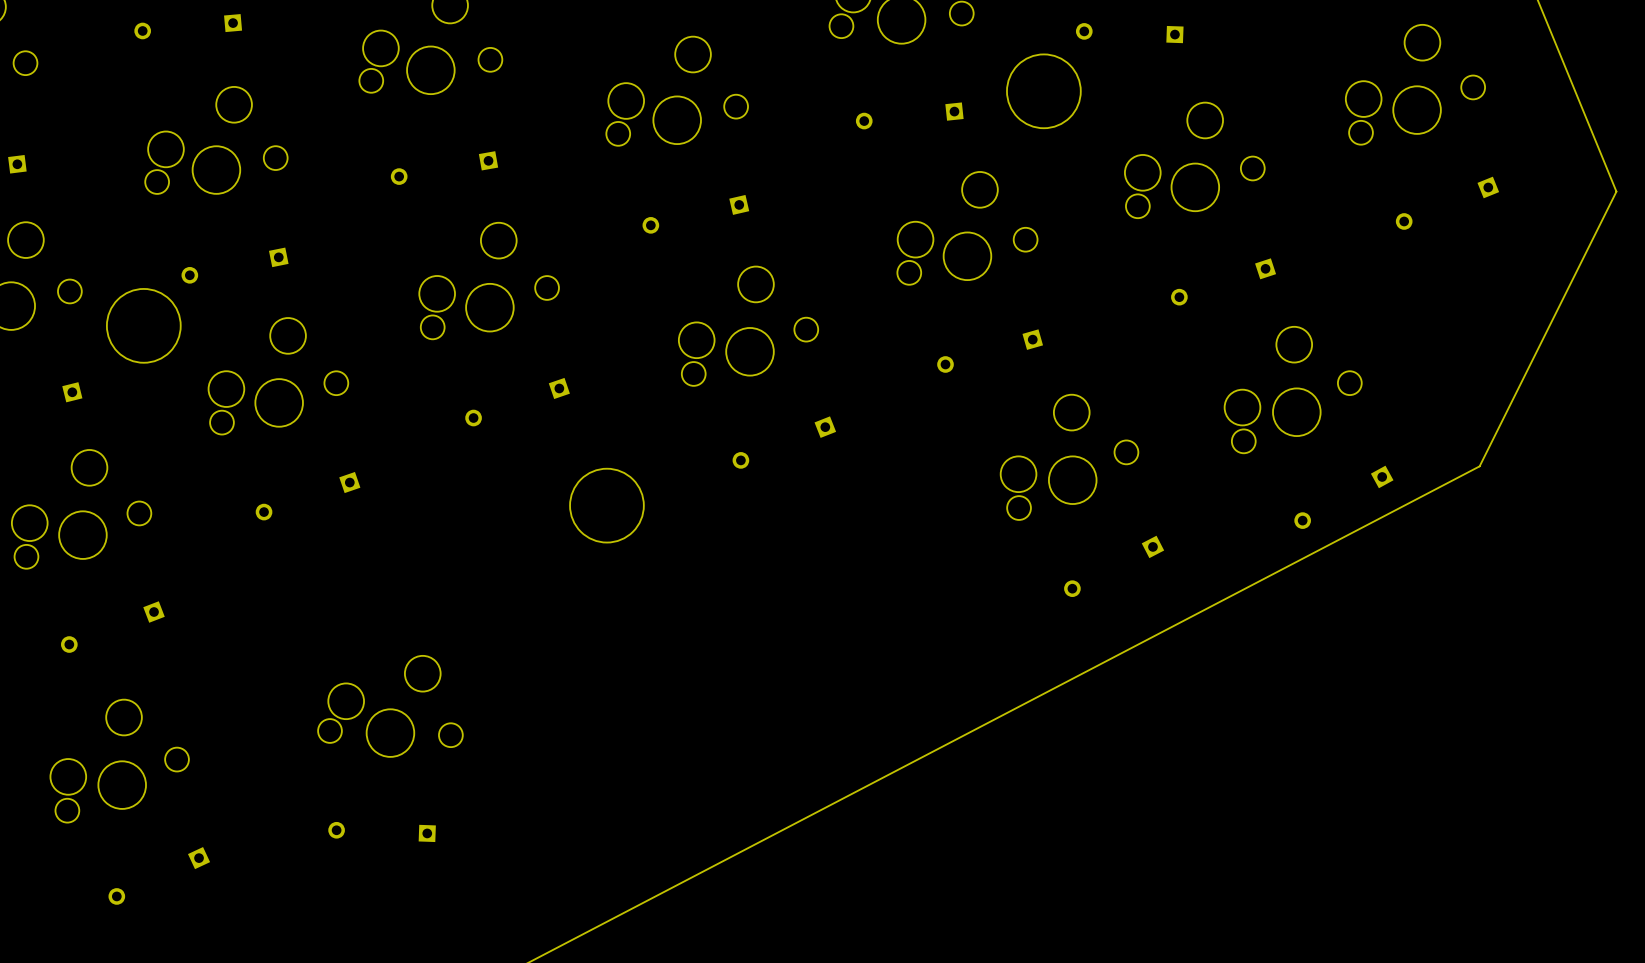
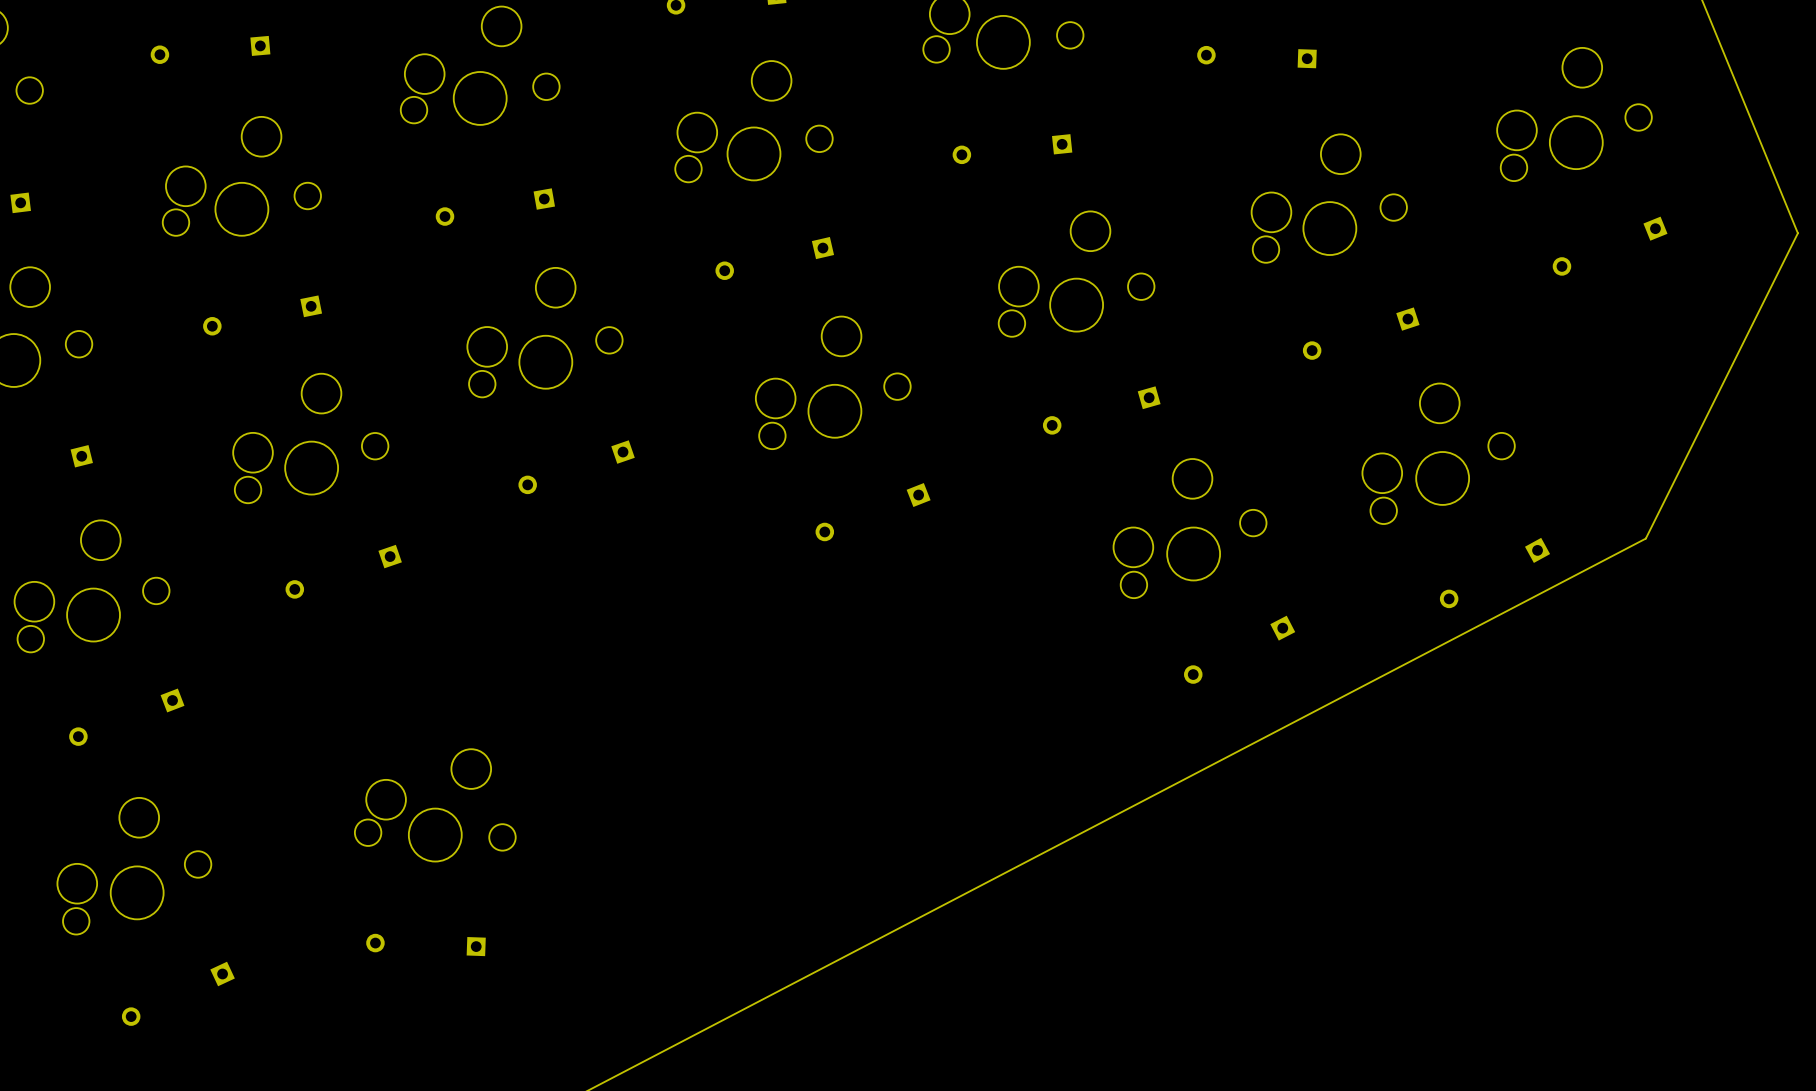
round board edge: [1006, 54, 1082, 129] -> none
round board edge: [106, 288, 182, 364] -> none
round board edge: [569, 468, 645, 543] -> none

